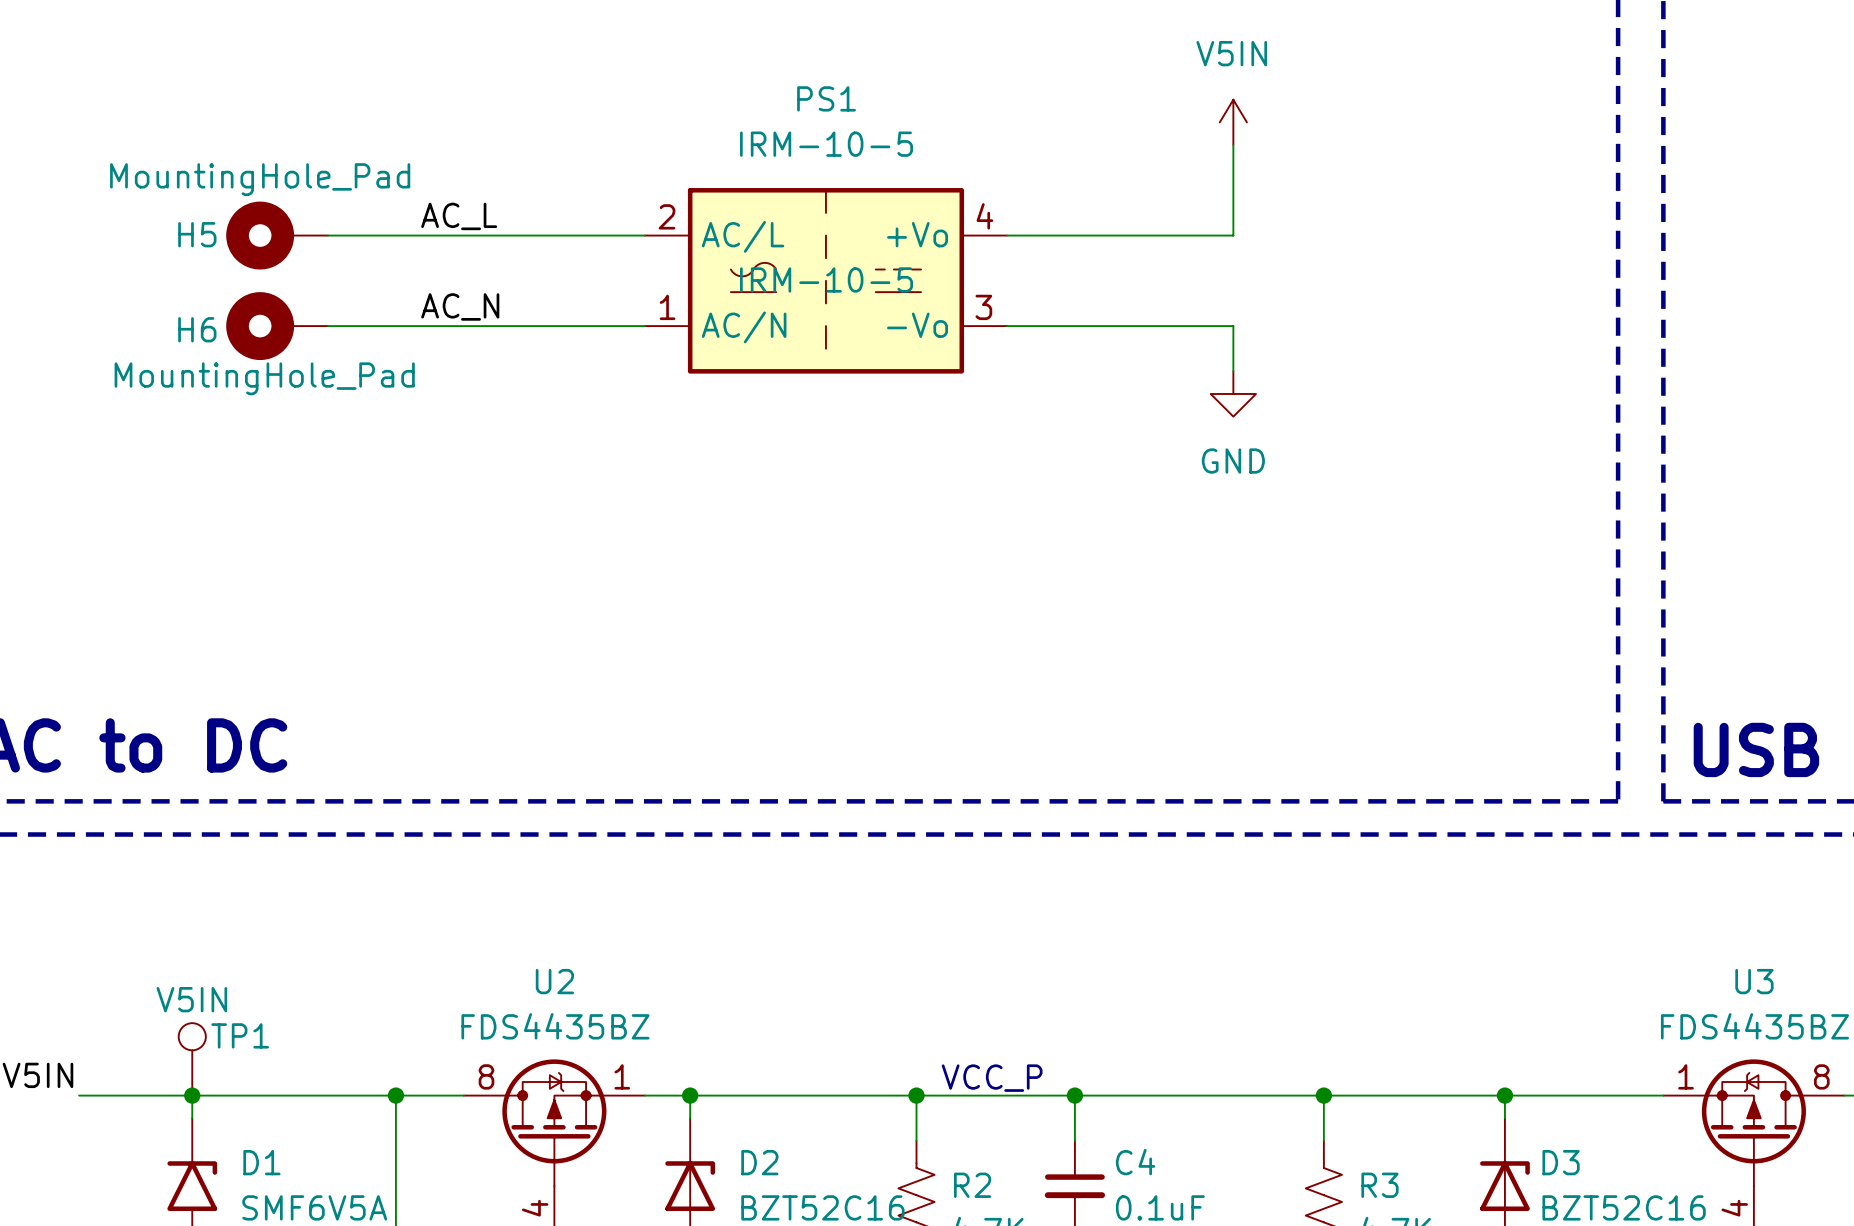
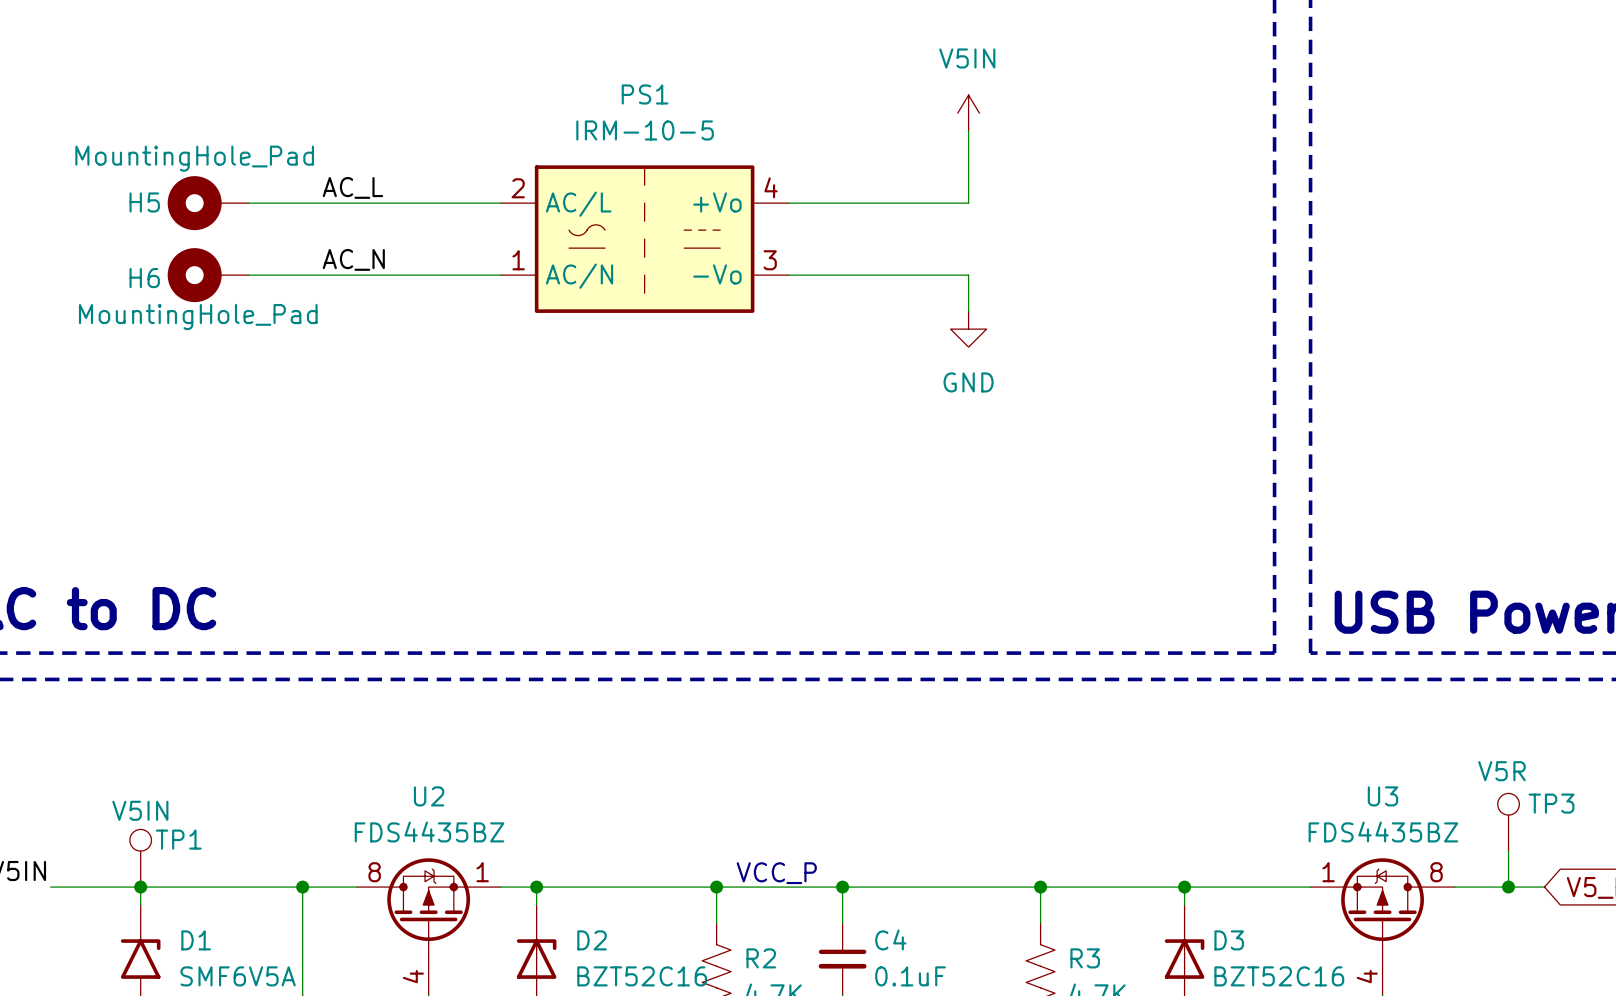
PS1 text: IRM-10-5 (826, 279) -> none

